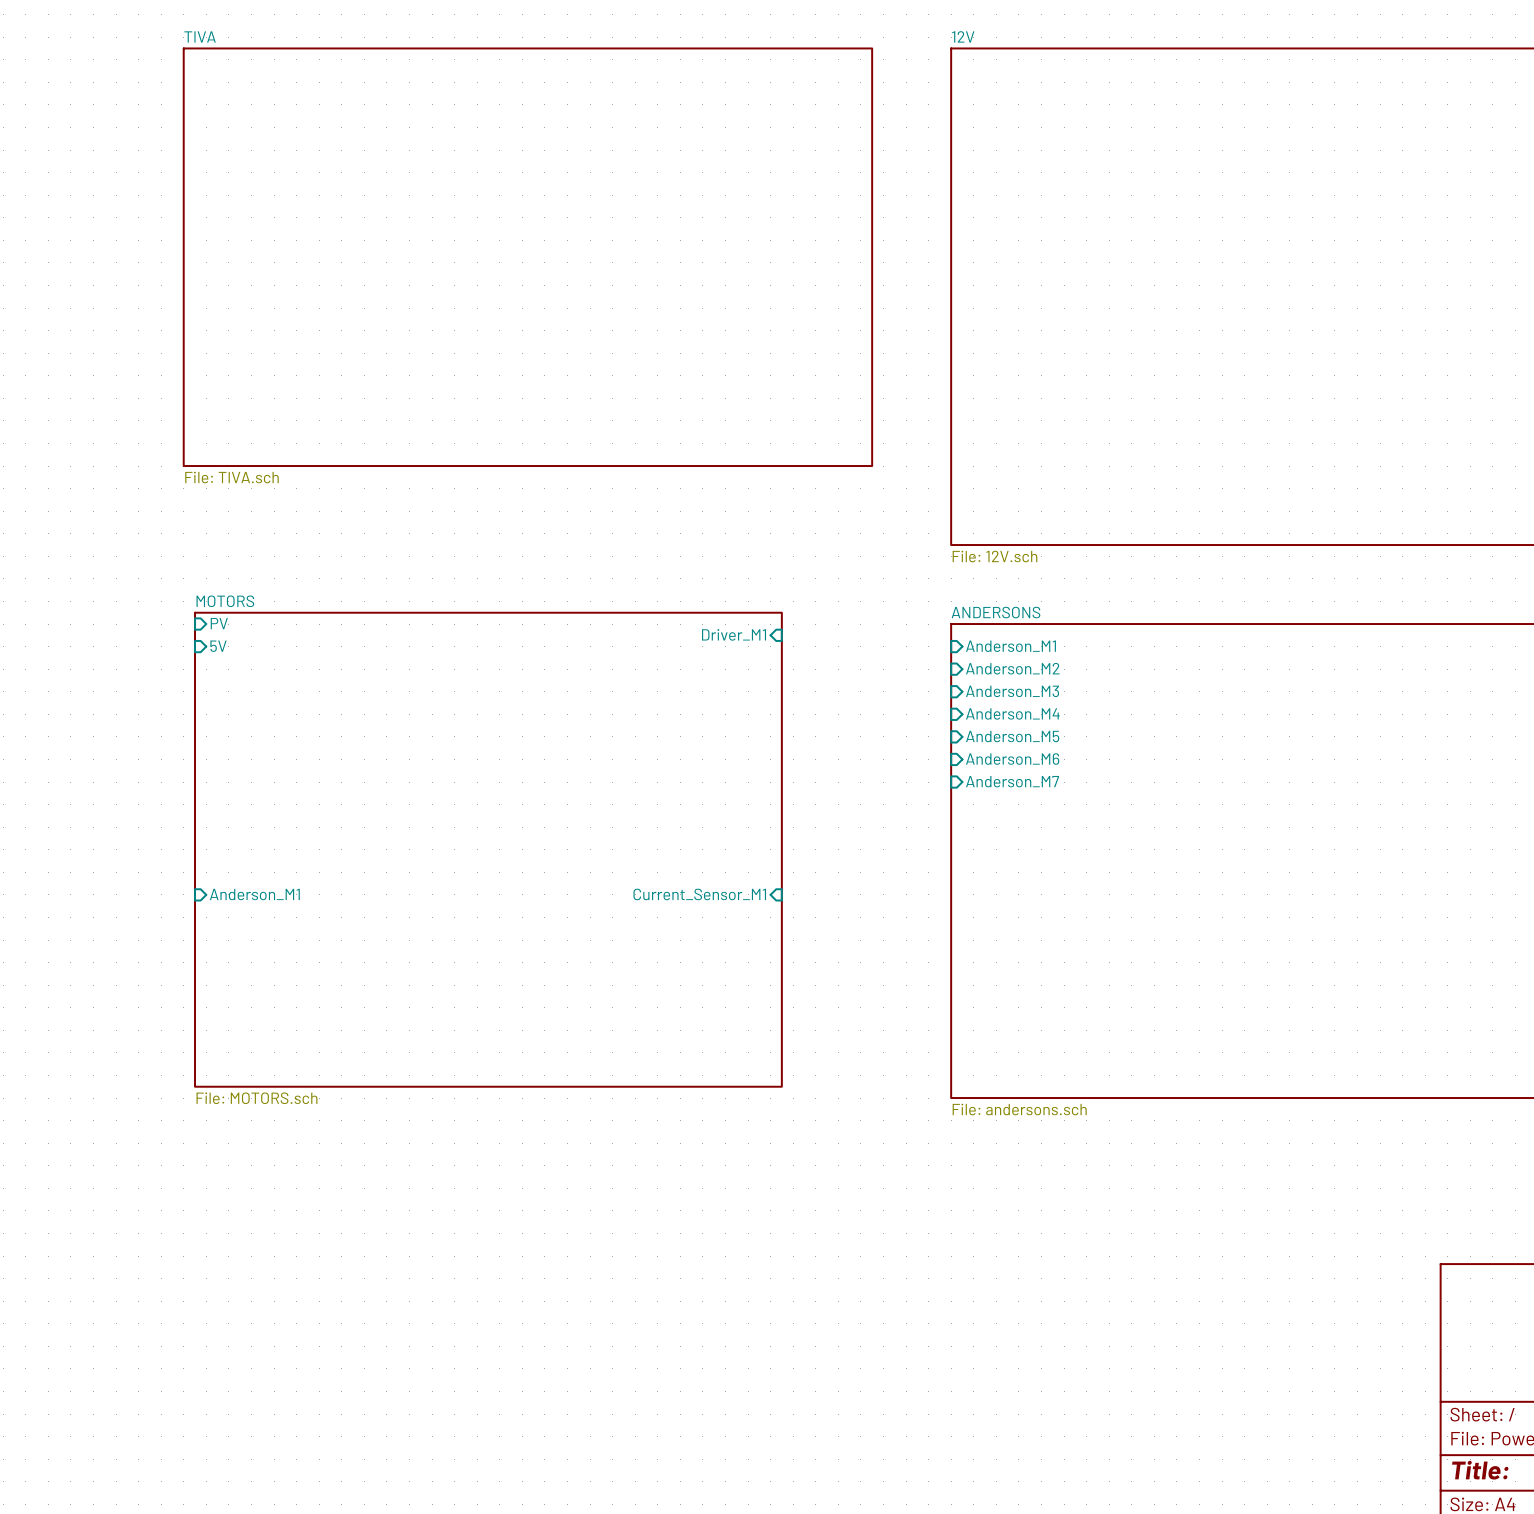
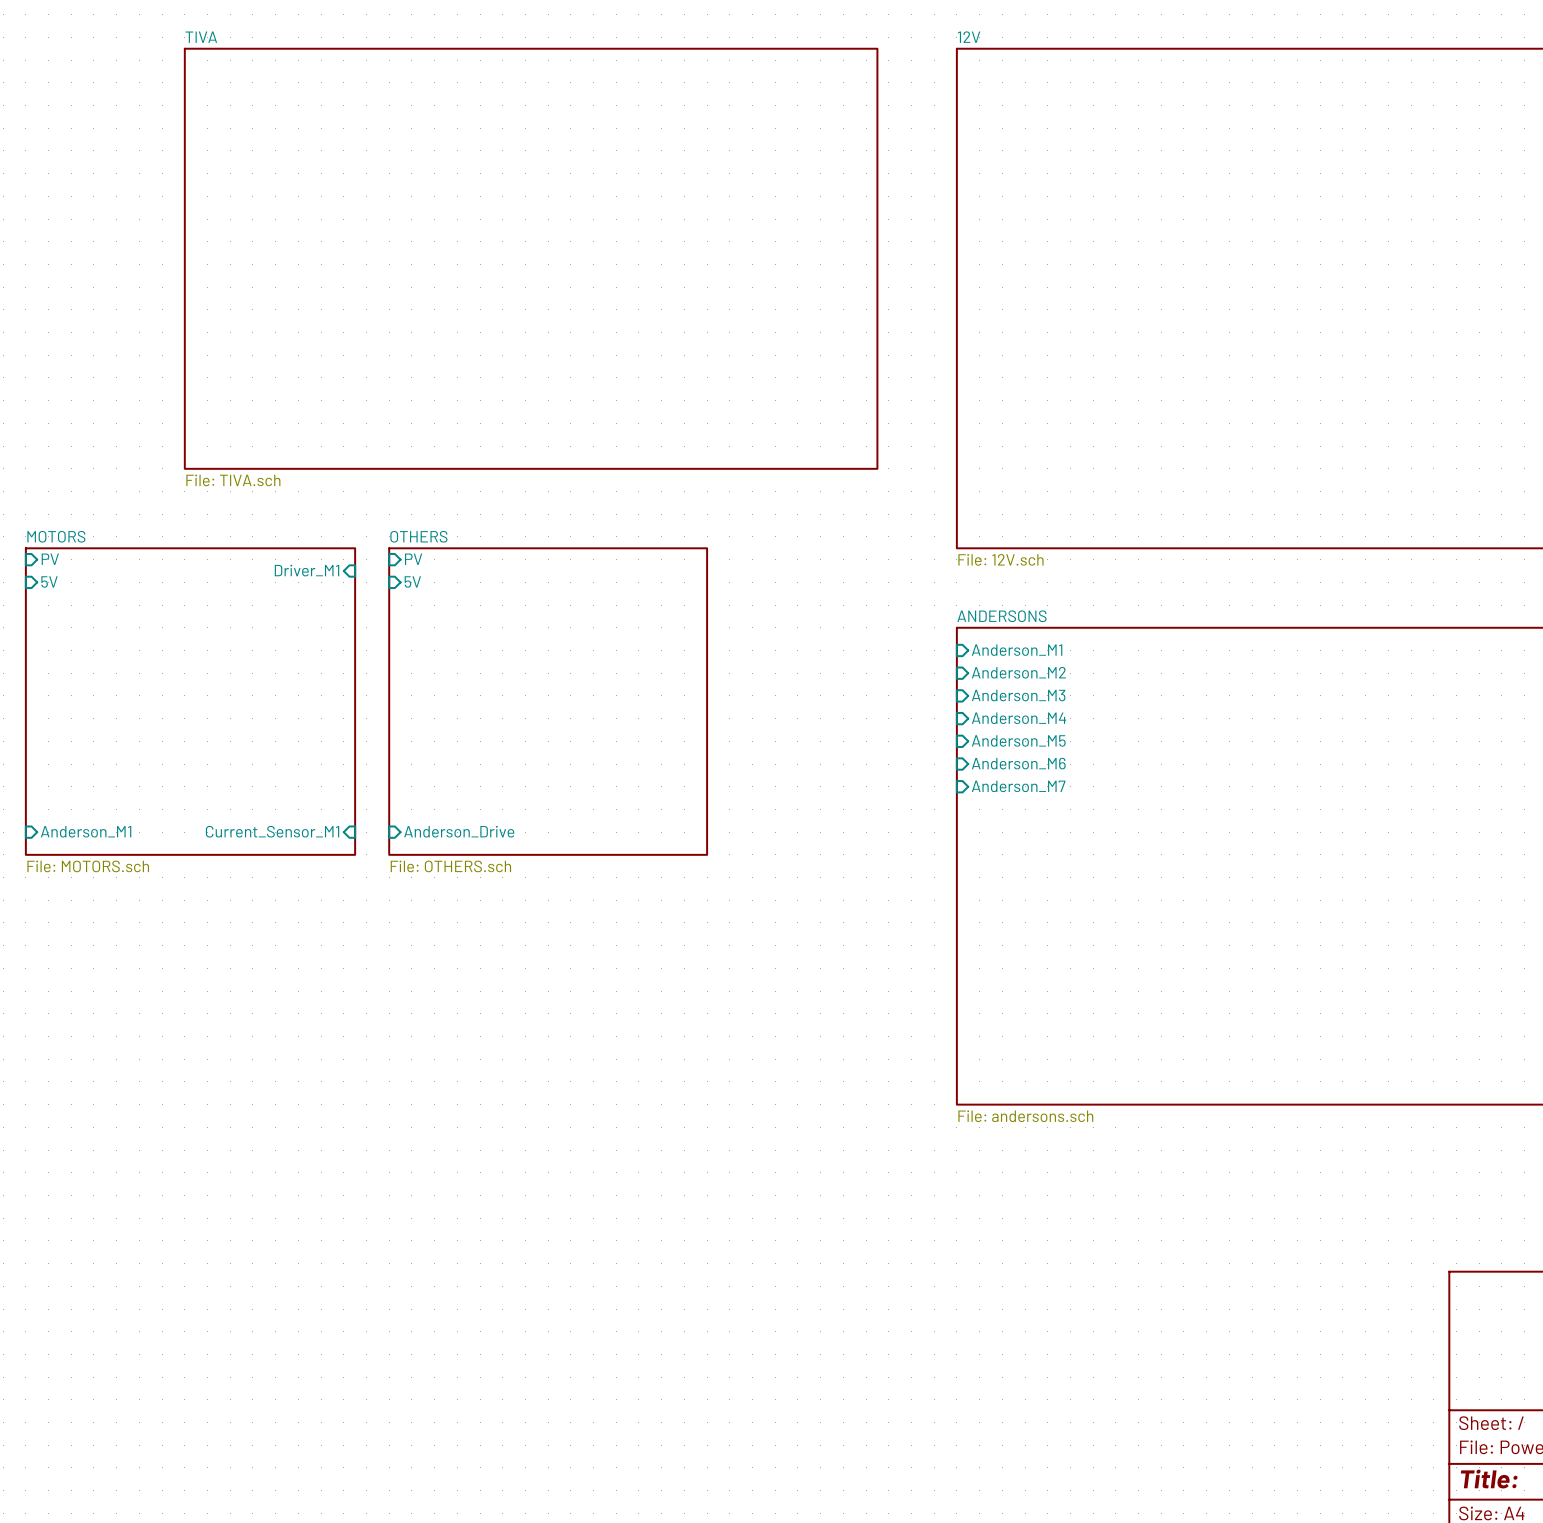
sheet pin: none -> PV (50, 559)
sheet pin: none -> PV (413, 559)
sheet pin: none -> Driver_M1 (307, 570)
sheet pin: none -> 5V (49, 581)
sheet pin: none -> 5V (412, 581)
sheet pin: PV (219, 623) -> none
sheet pin: Driver_M1 (734, 634) -> none
sheet pin: 5V (218, 646) -> none
sheet MOTORS: none -> File: MOTORS.sch (190, 701)
sheet OTHERS: none -> File: OTHERS.sch (548, 701)
sheet pin: none -> Current_Sensor_M1 (272, 831)
sheet pin: none -> Anderson_Drive (459, 831)
sheet MOTORS: File: MOTORS.sch (488, 849) -> none
sheet pin position: Anderson_M1 (254, 894) -> Anderson_M1 (86, 831)
sheet pin: Current_Sensor_M1 (699, 894) -> none

